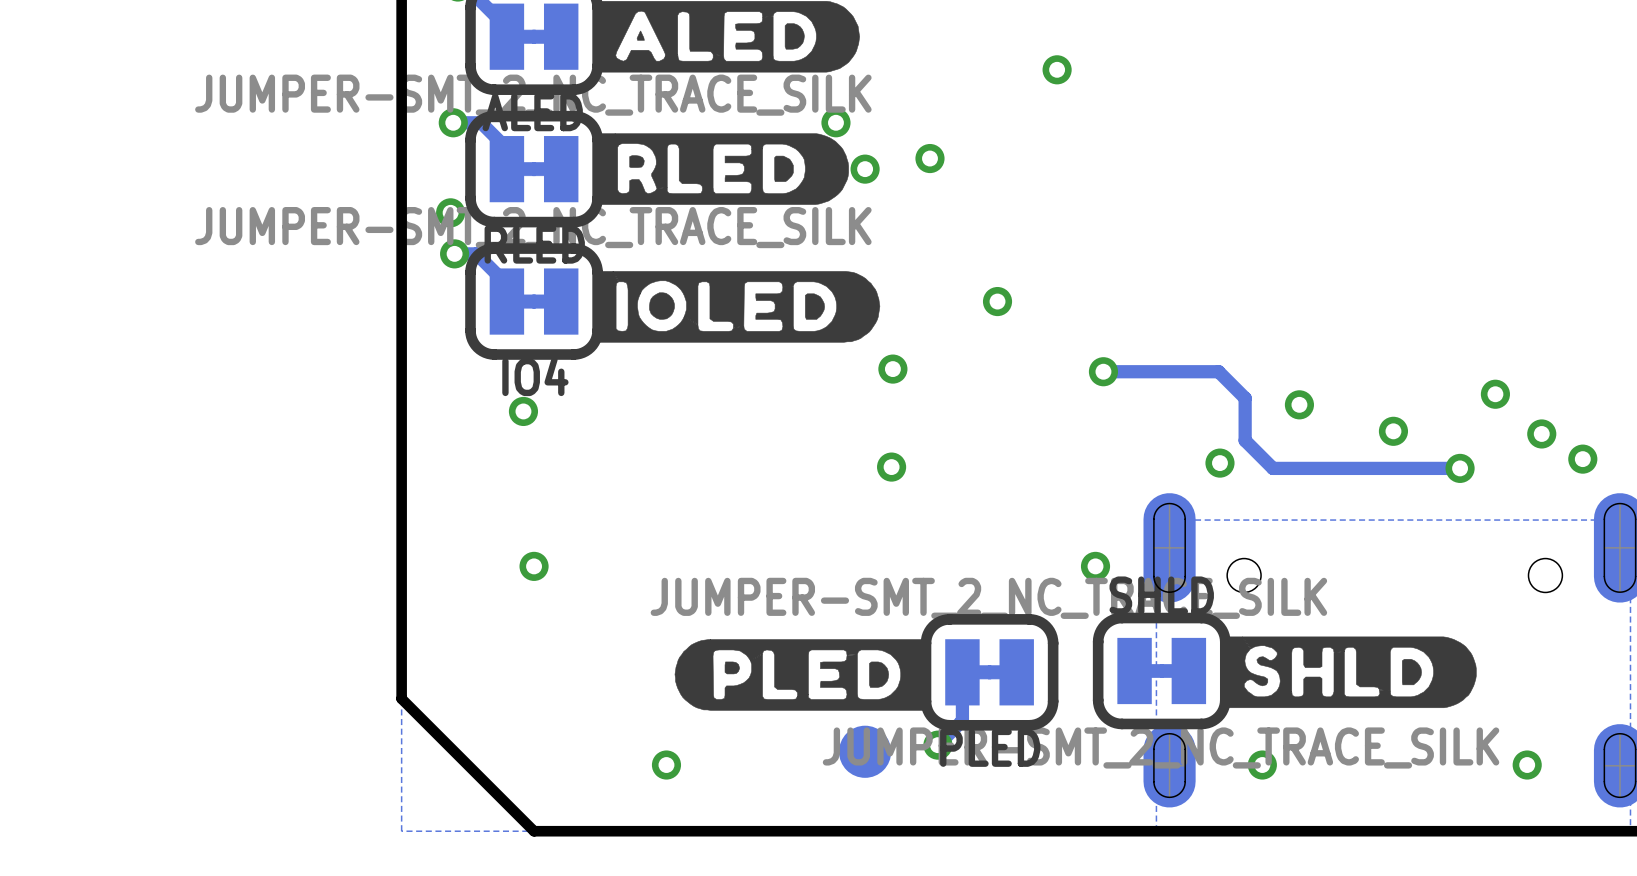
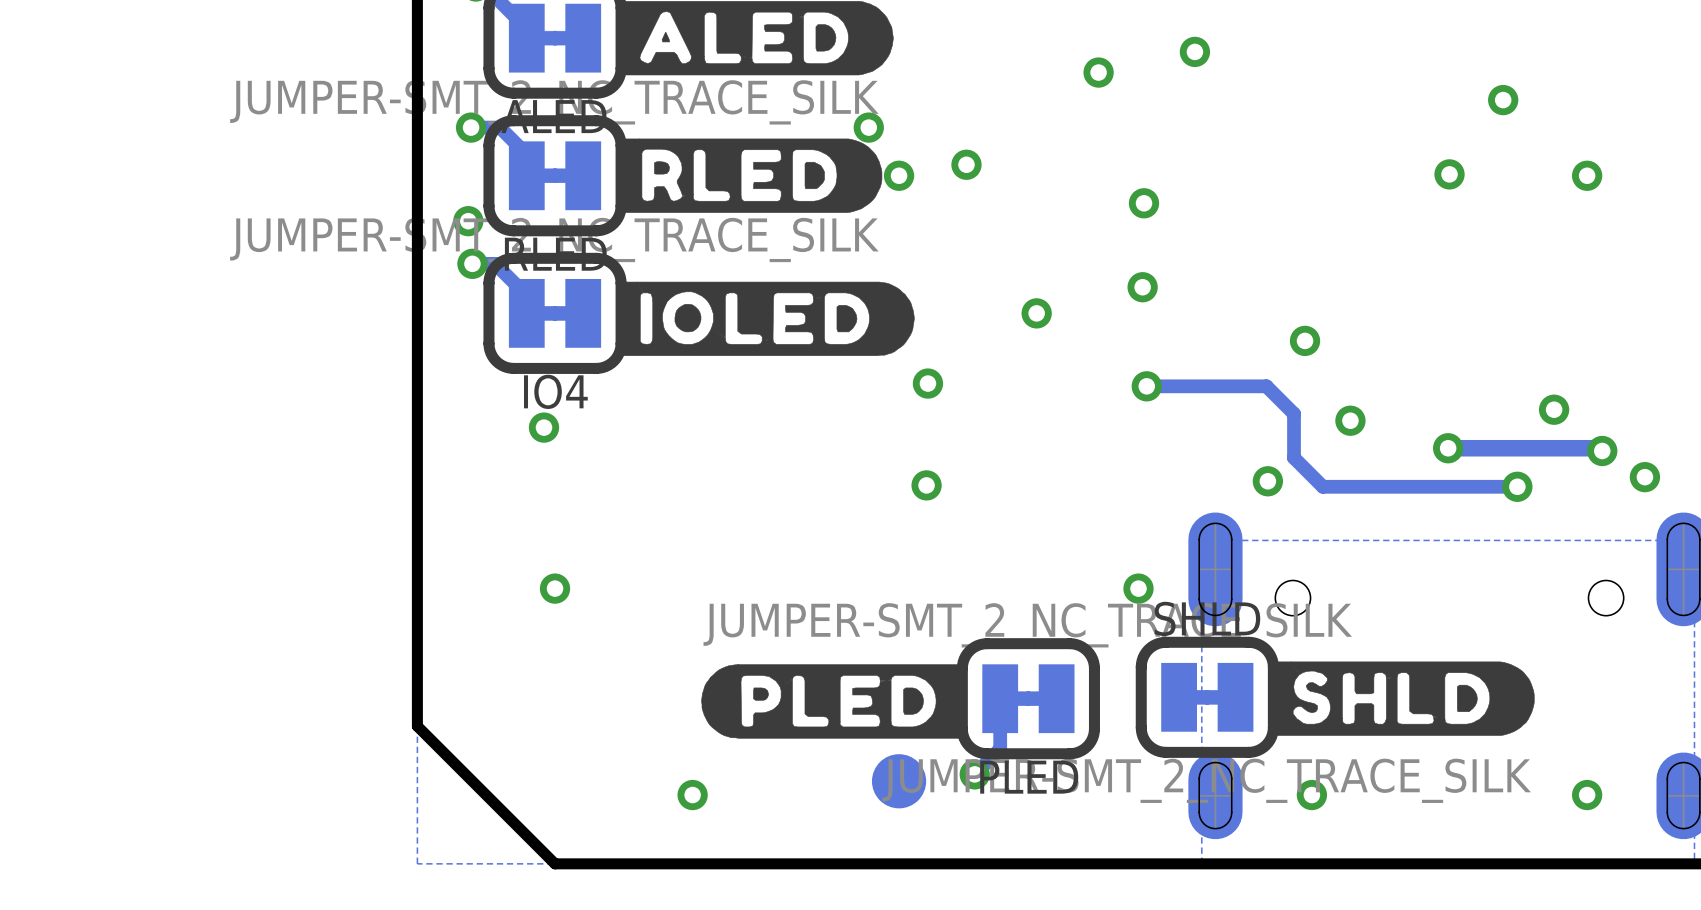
via: none -> (1194, 51)
via: none -> (1503, 100)
via: none -> (1449, 174)
via: none -> (1587, 175)
via: none -> (1144, 203)
via: none -> (1142, 287)
via: none -> (1305, 340)
track: none -> (1448, 448) (1599, 448) (1602, 451)

